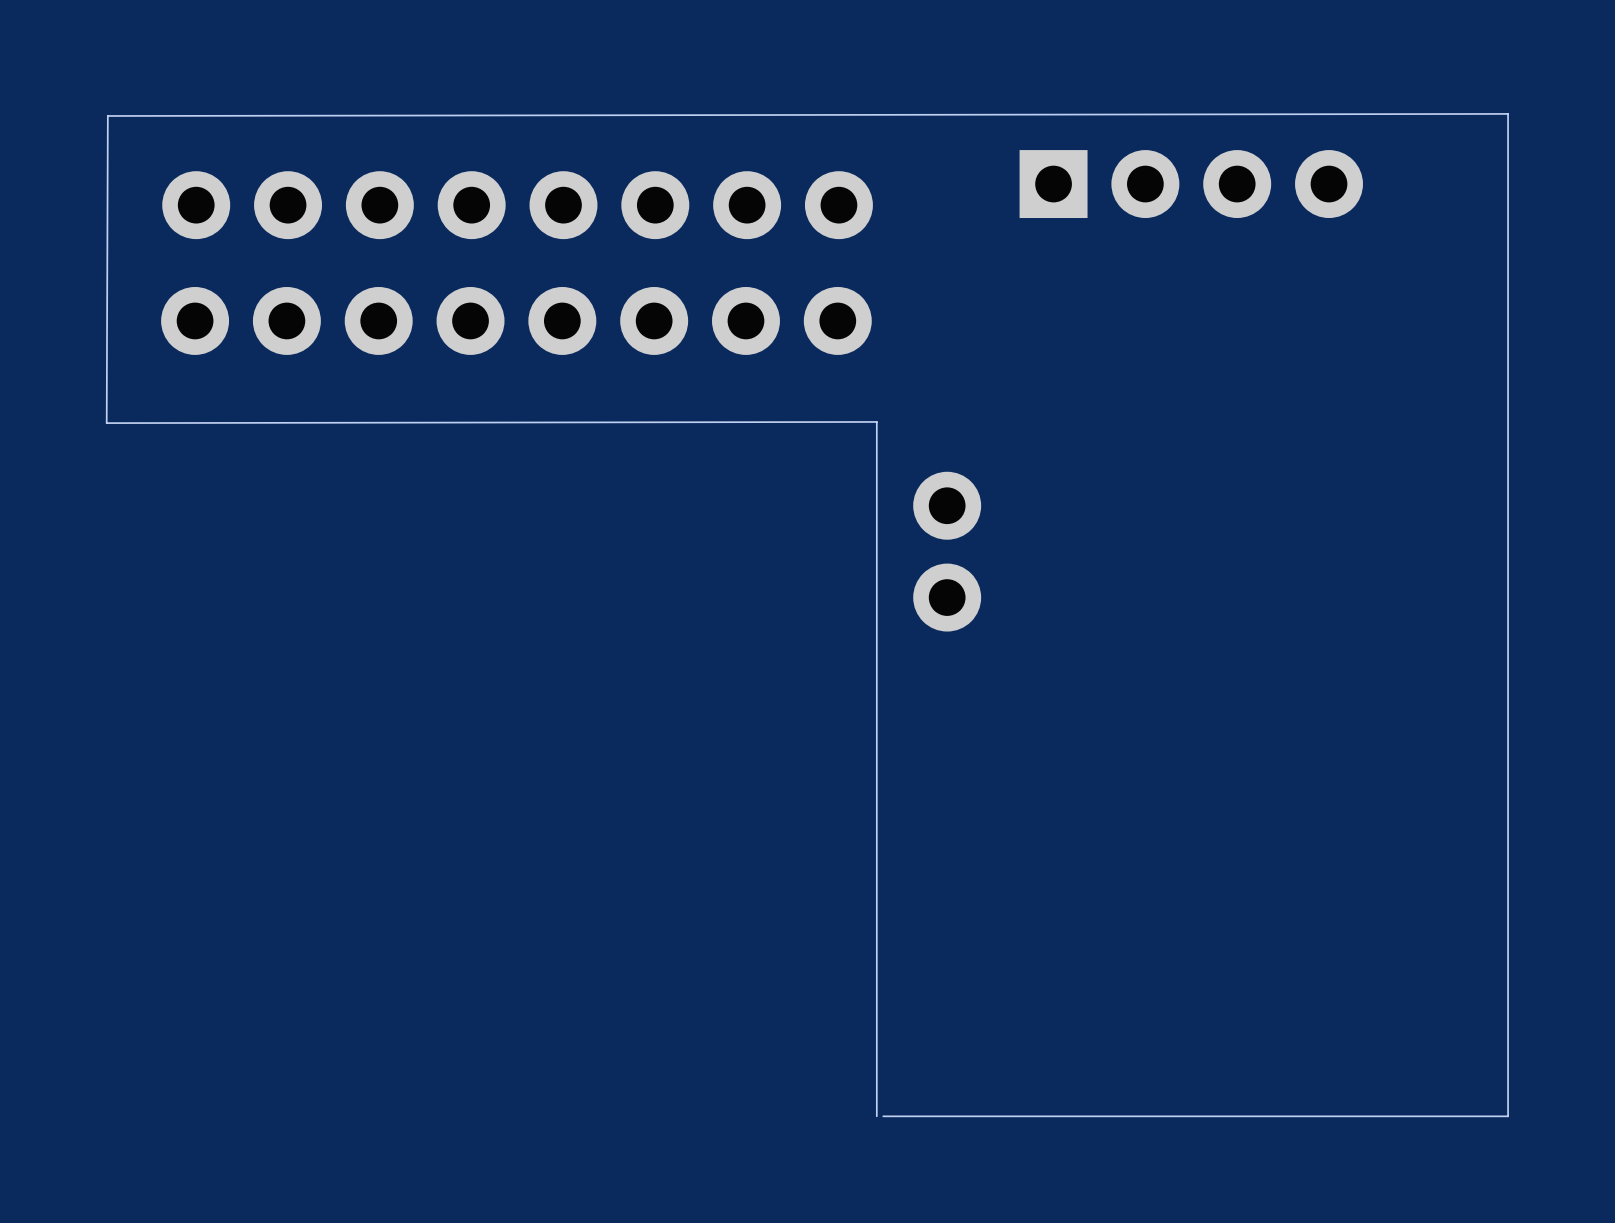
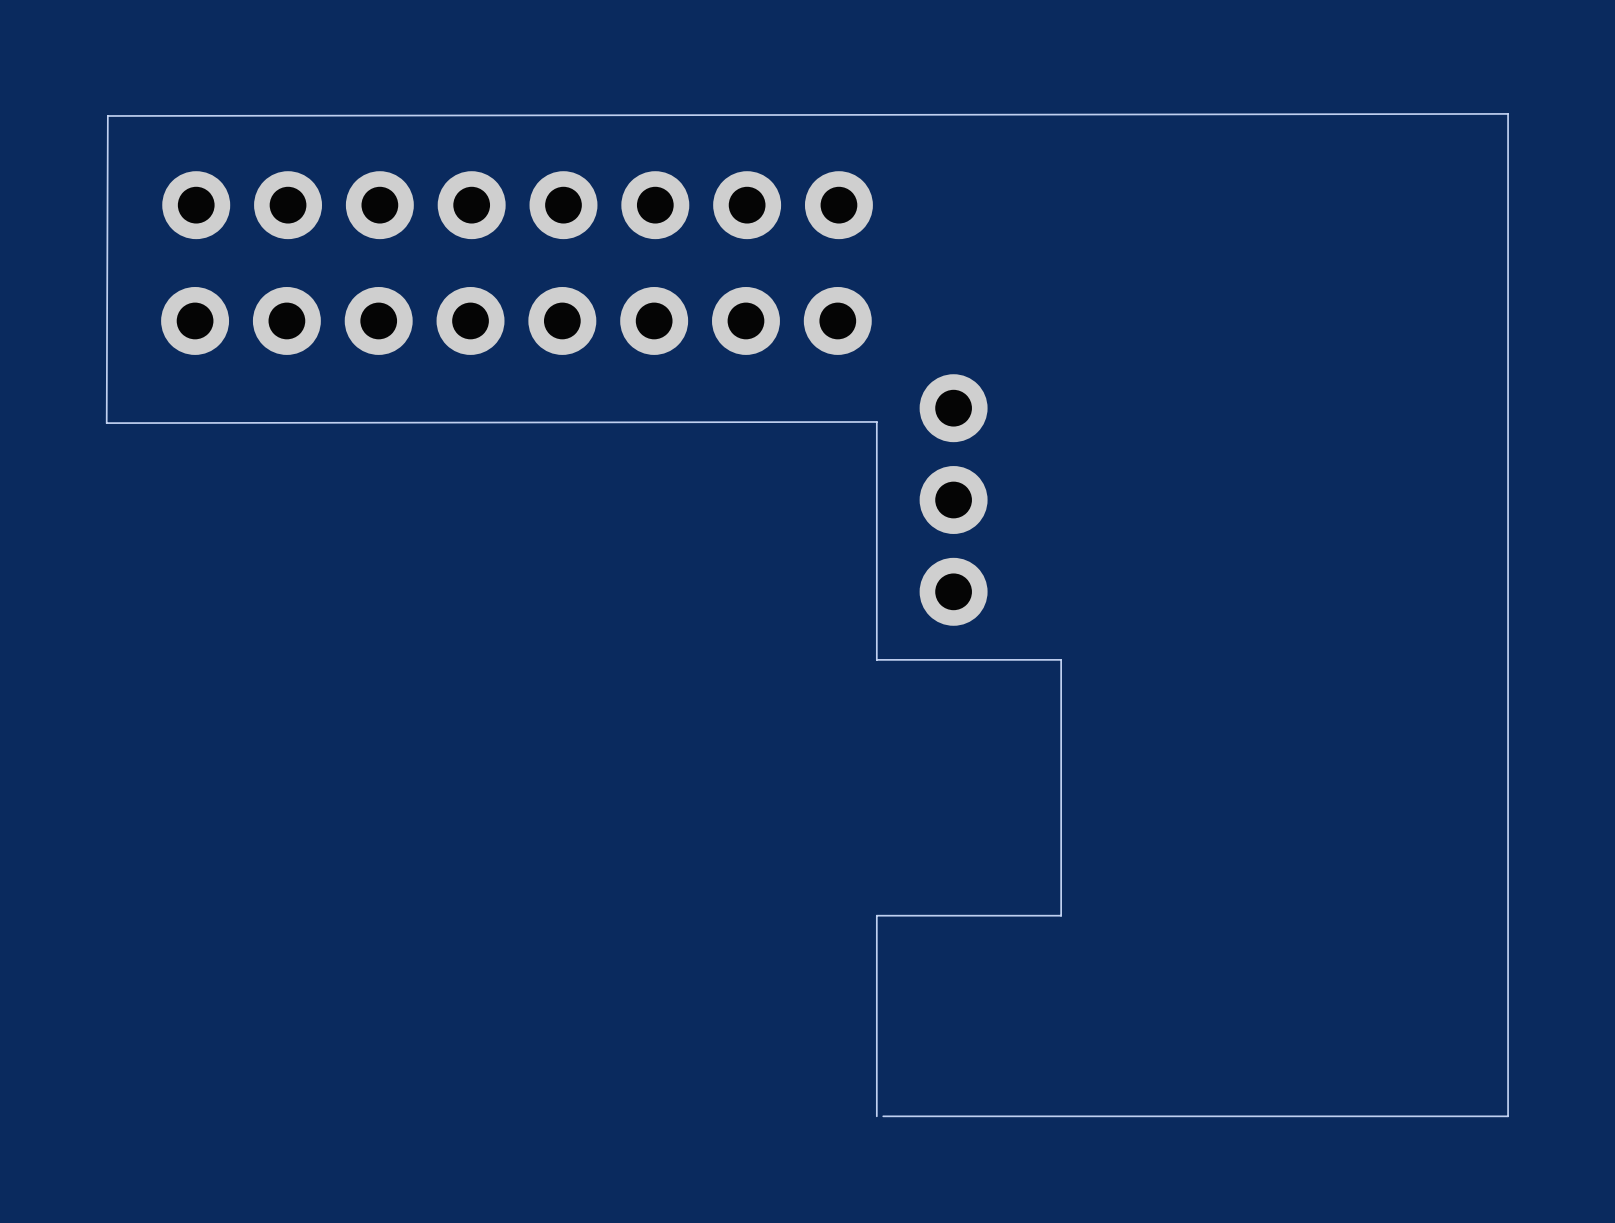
part: (1191, 184) -> none
part: none -> (953, 500)
part: (947, 551) -> none
board edge: (876, 659) (876, 915) -> (876, 659) (1061, 659) (1061, 915) (876, 915)

